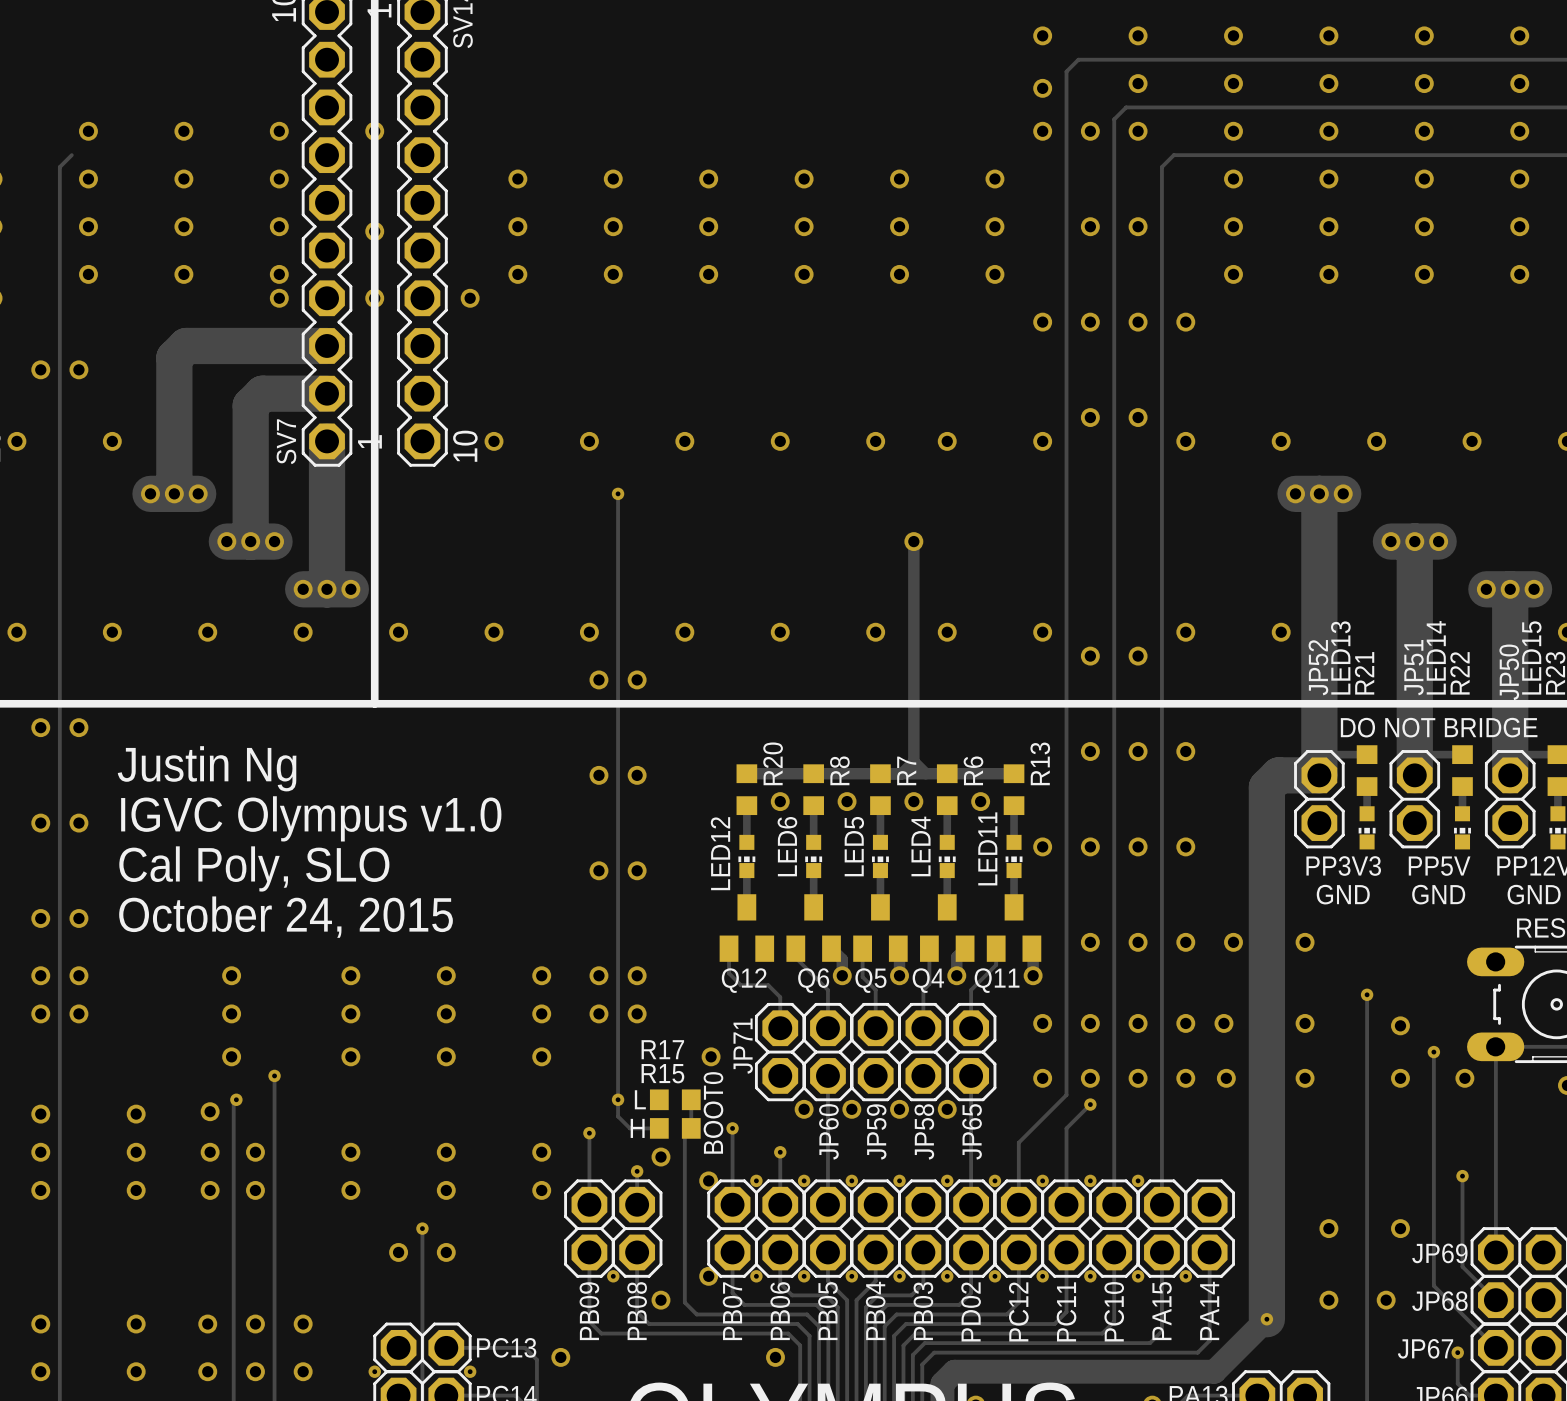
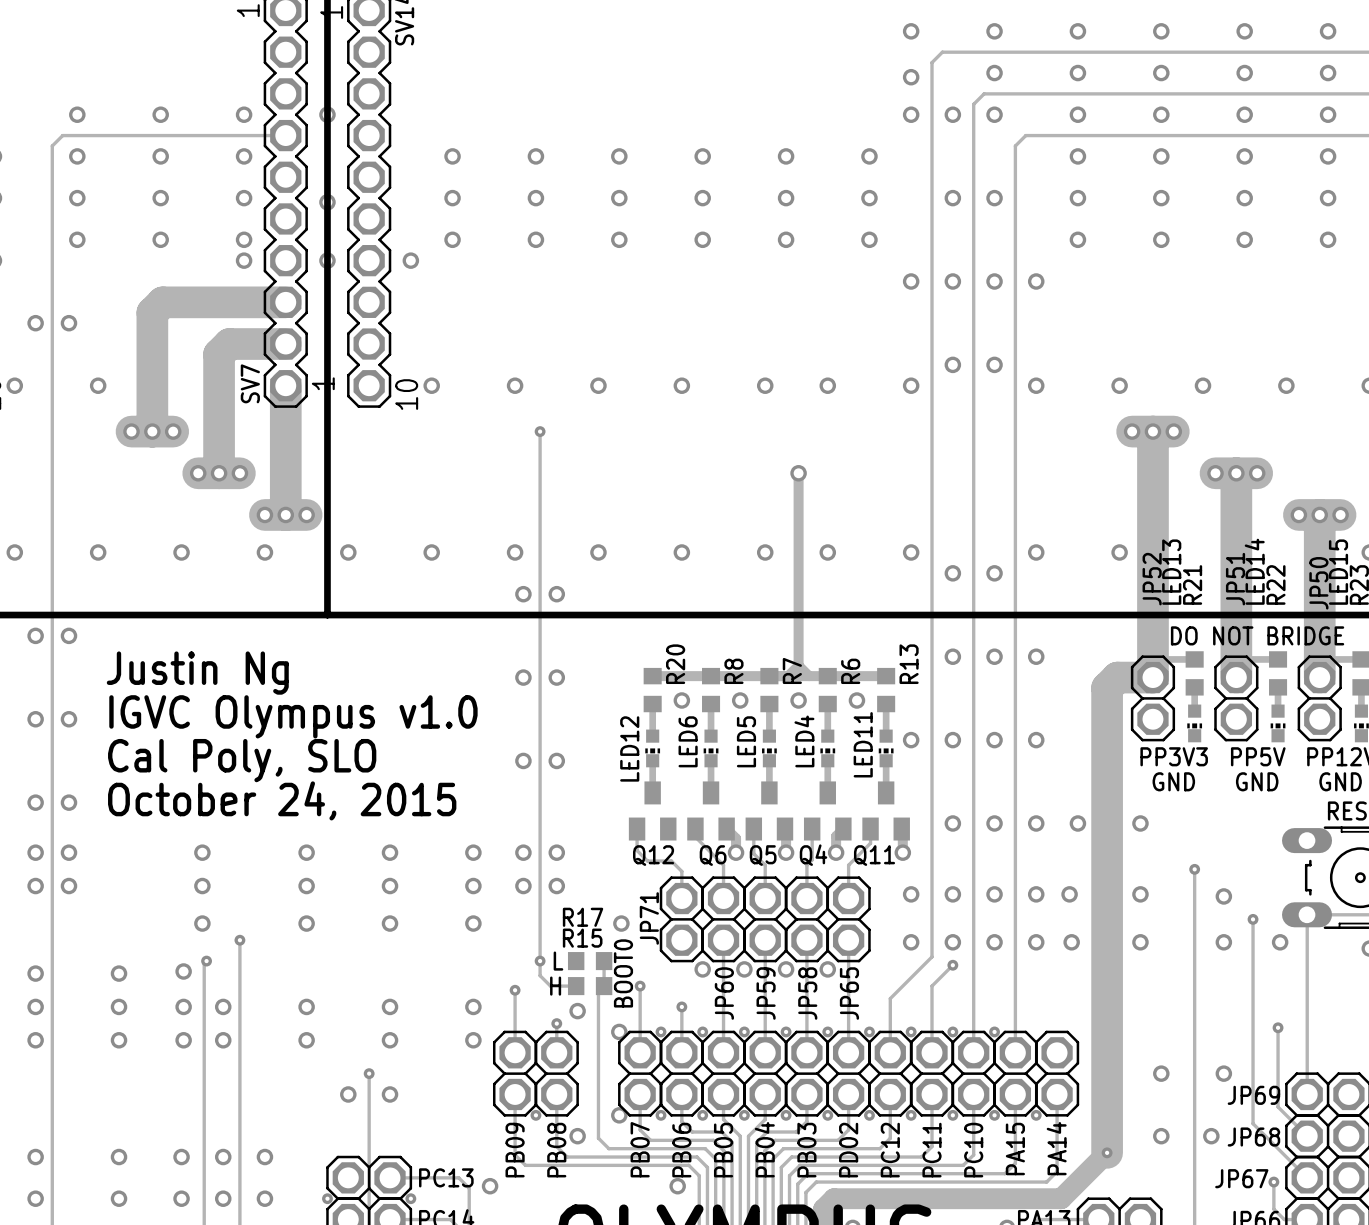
track: none -> (62, 135) (285, 135)
track: none -> (765, 940) (765, 1052)
track: none -> (806, 940) (806, 1052)

